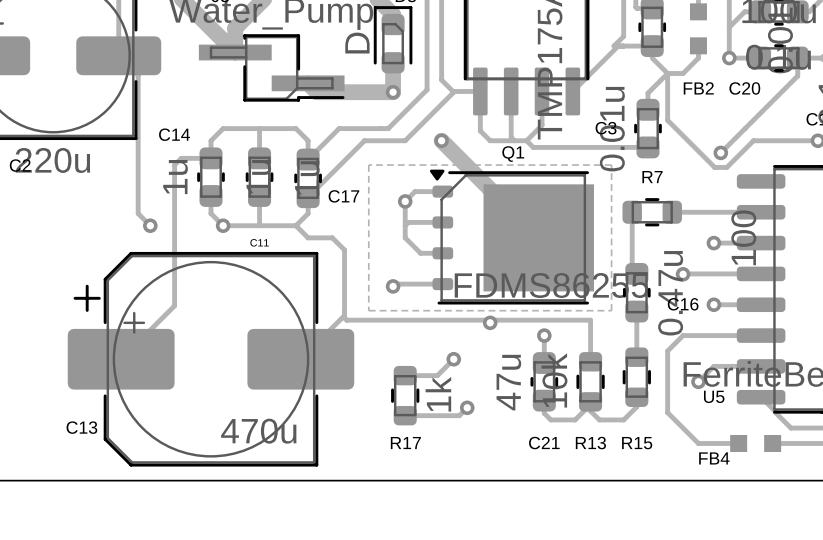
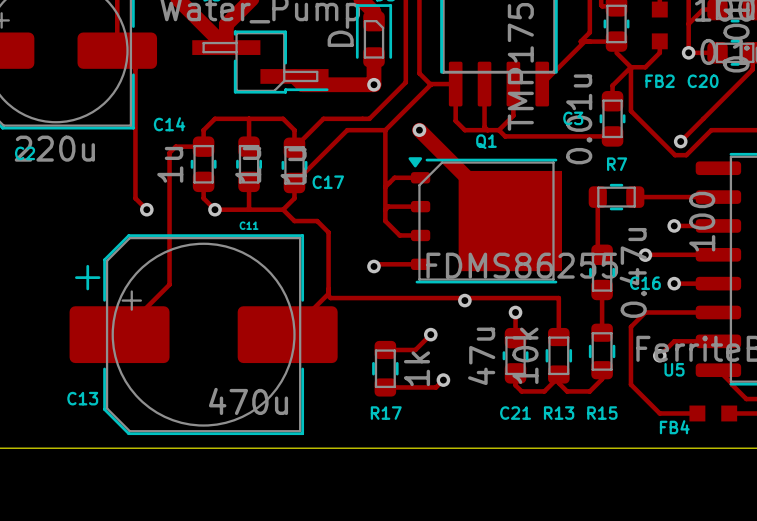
track: none -> (385, 130) (385, 186)
zone outline: (368, 165) (611, 165) (611, 310) (368, 310) (368, 165) -> none
via: (405, 201) -> none

